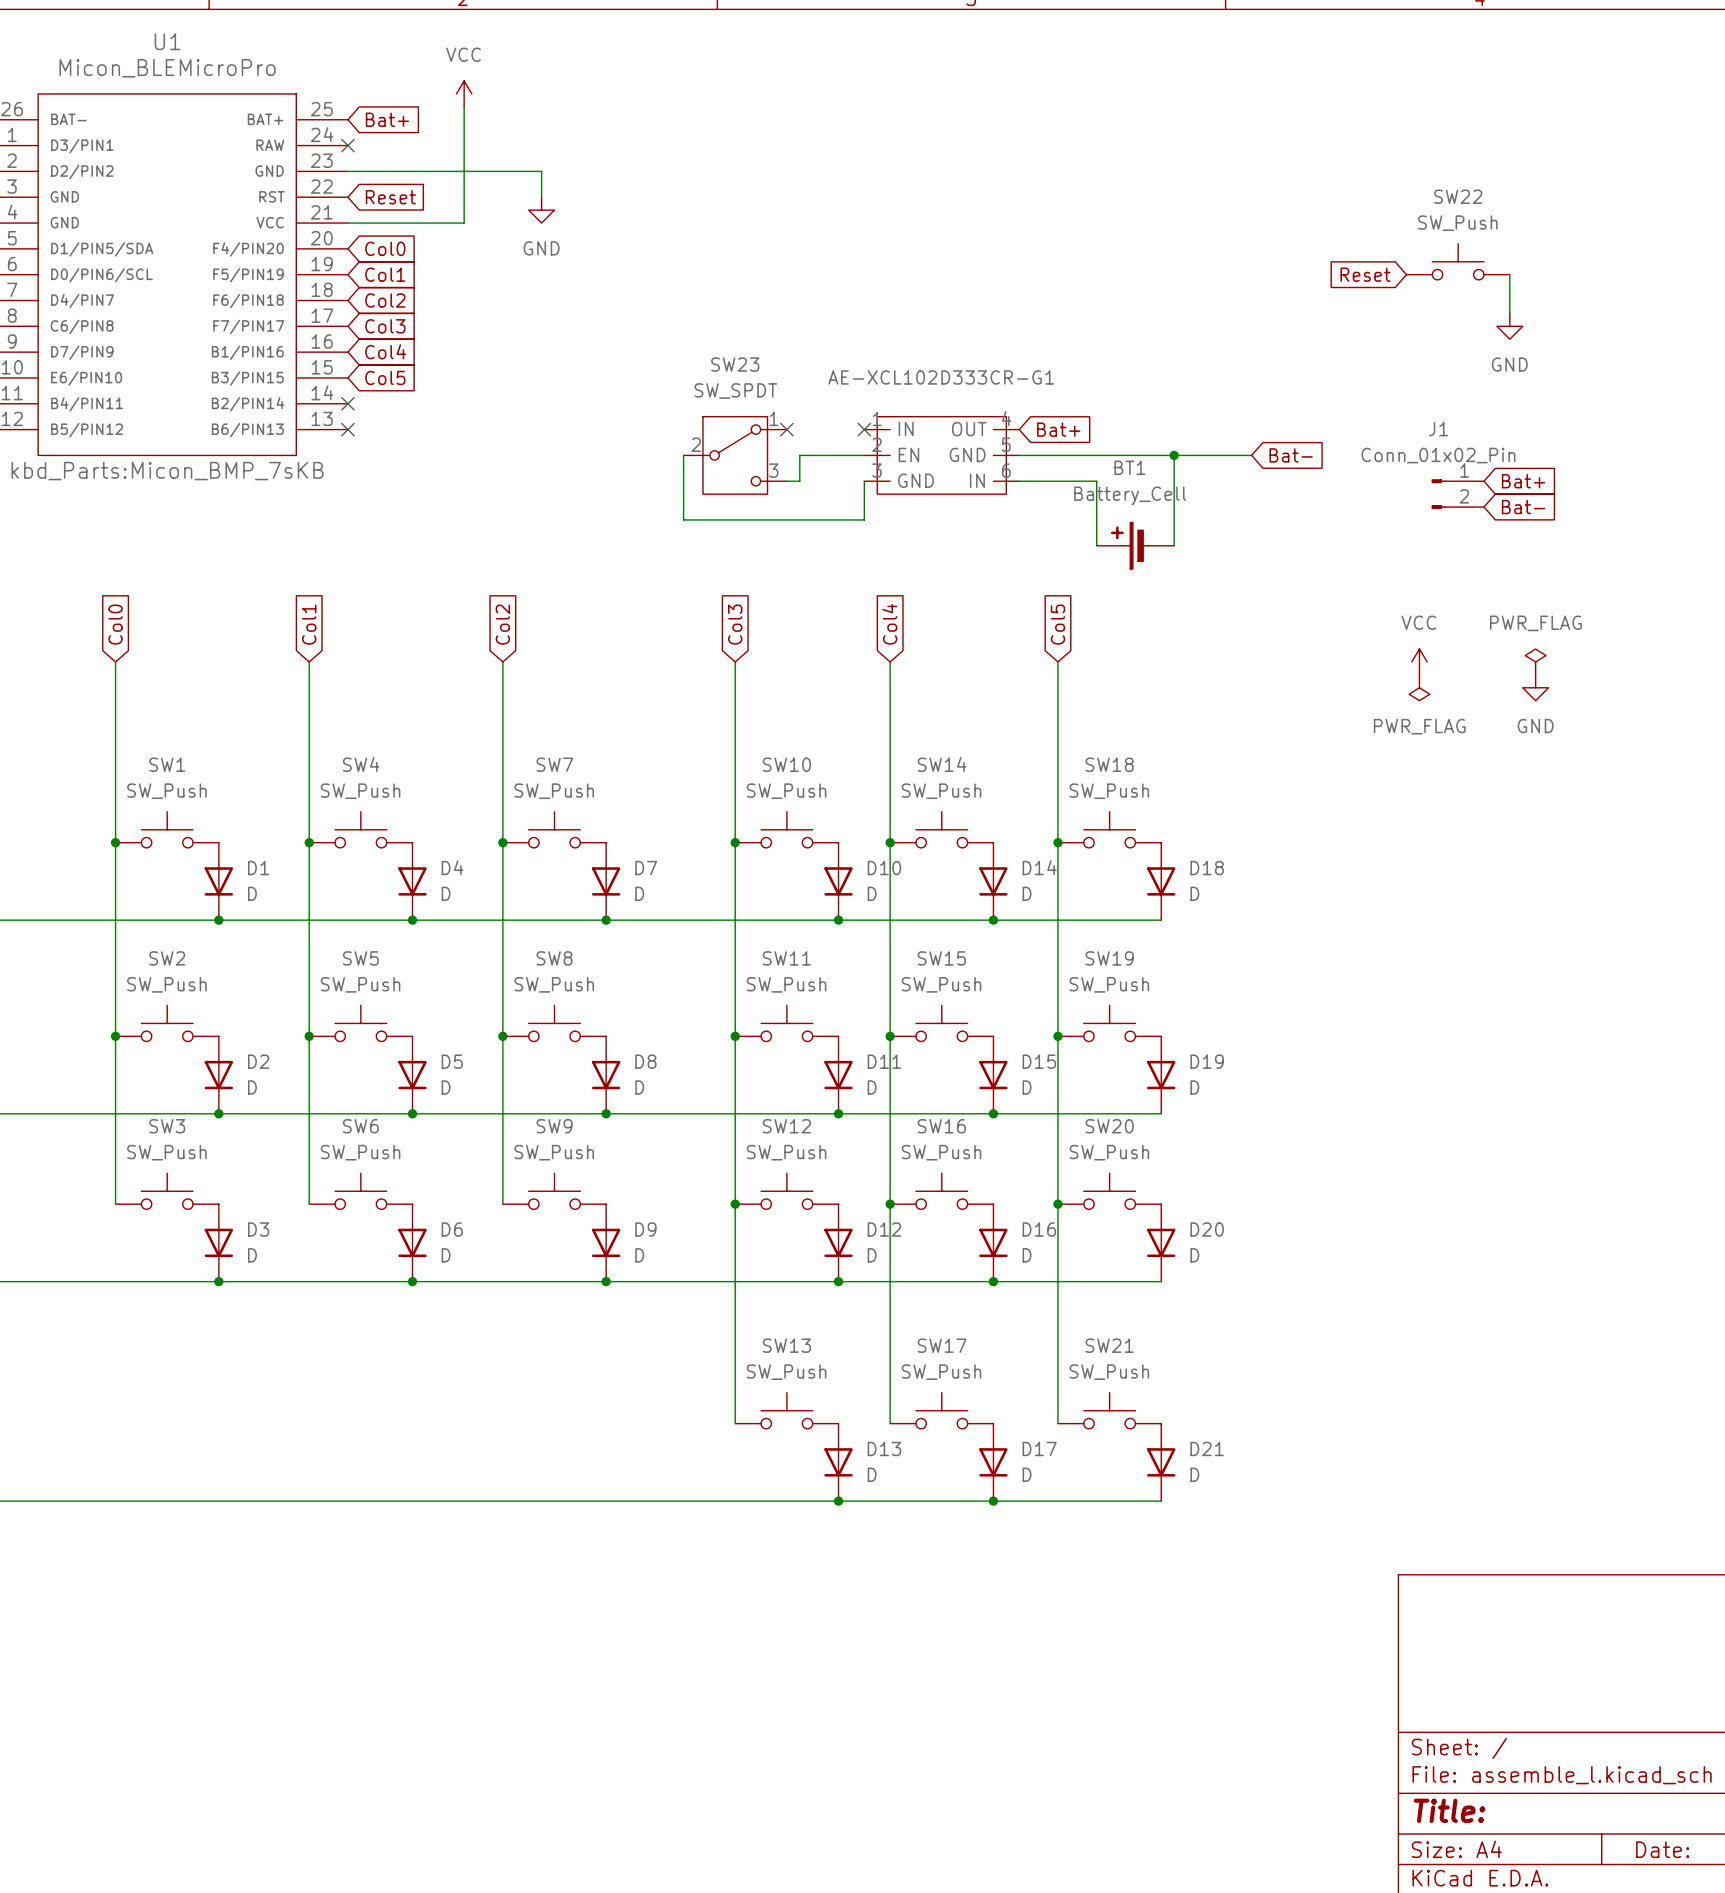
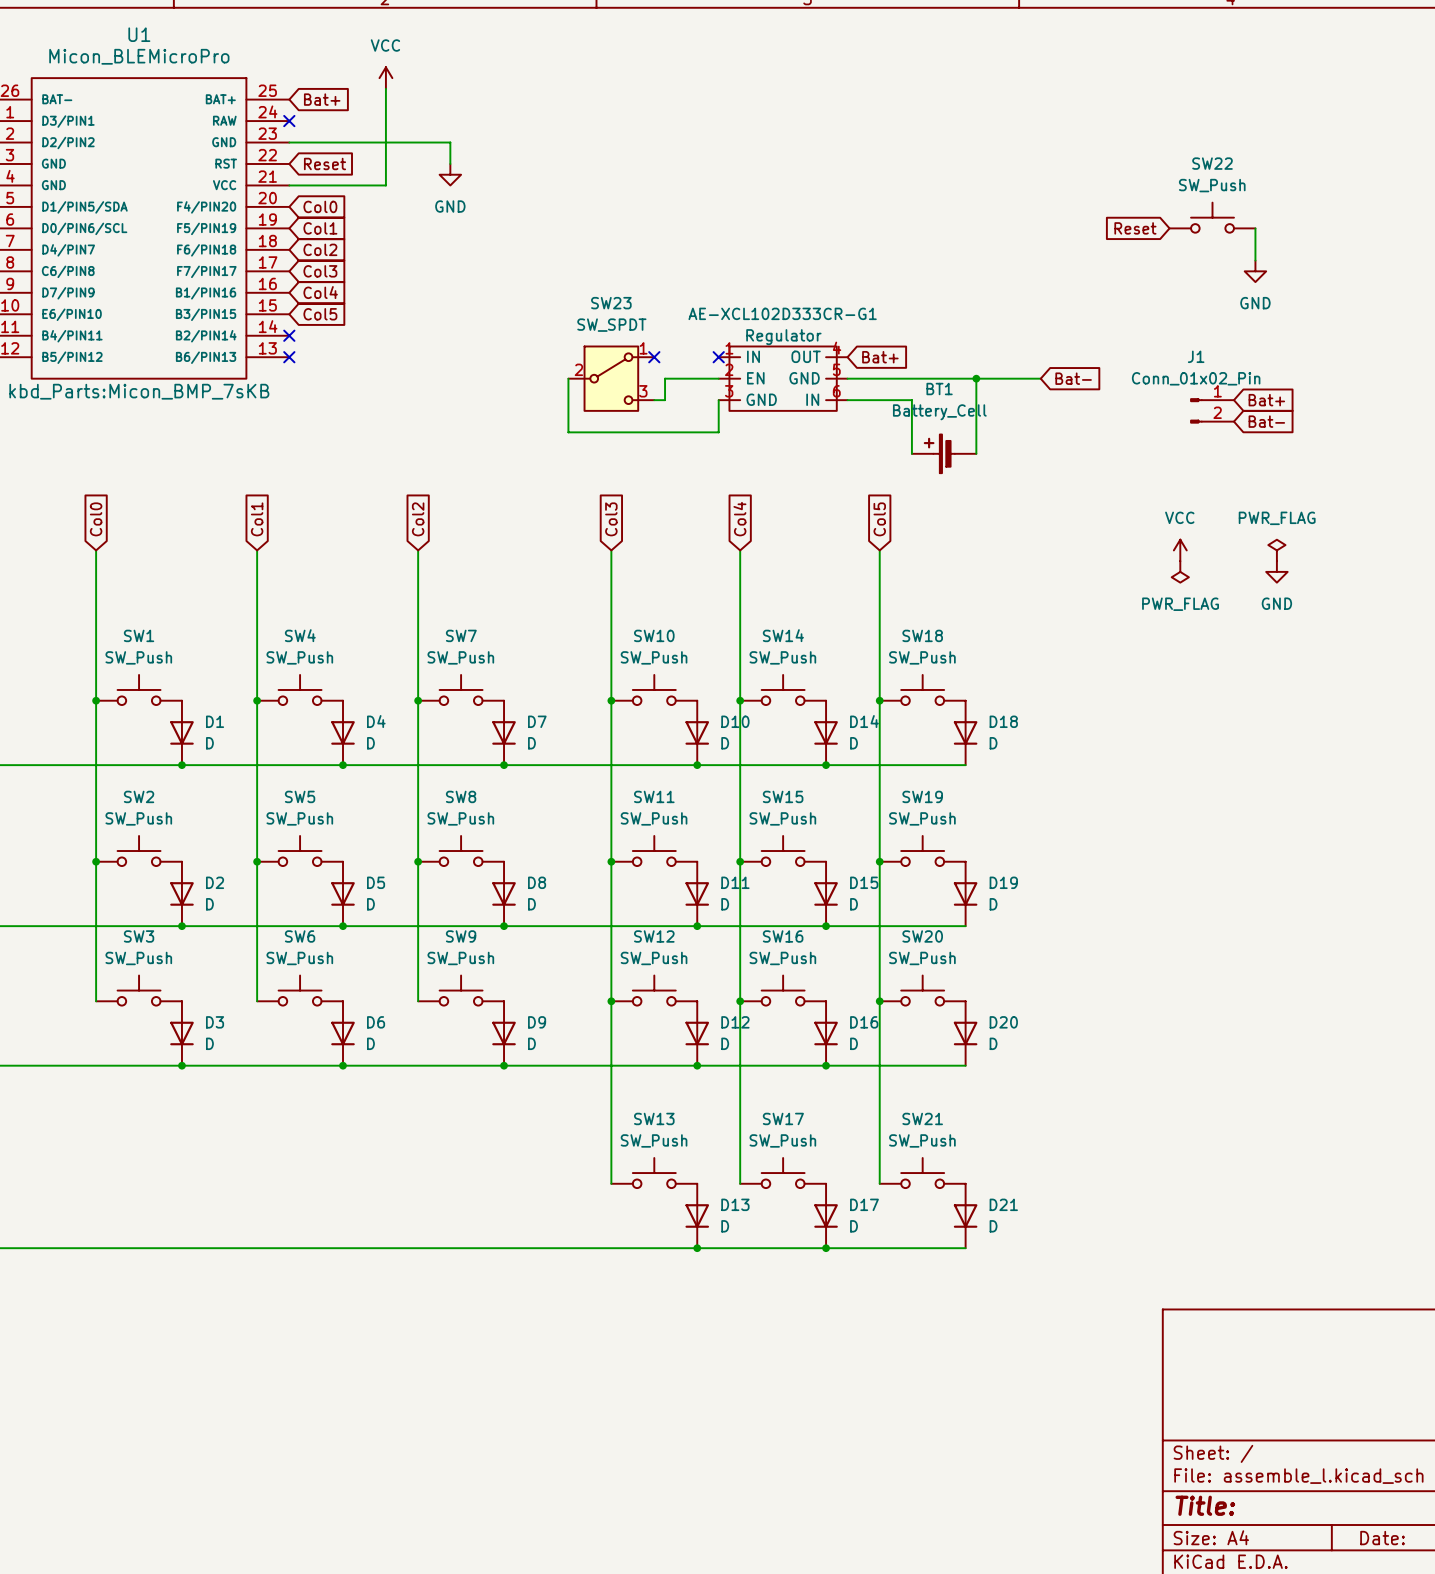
AE-XCL102D333CR-G1 value: none -> Regulator (783, 337)

